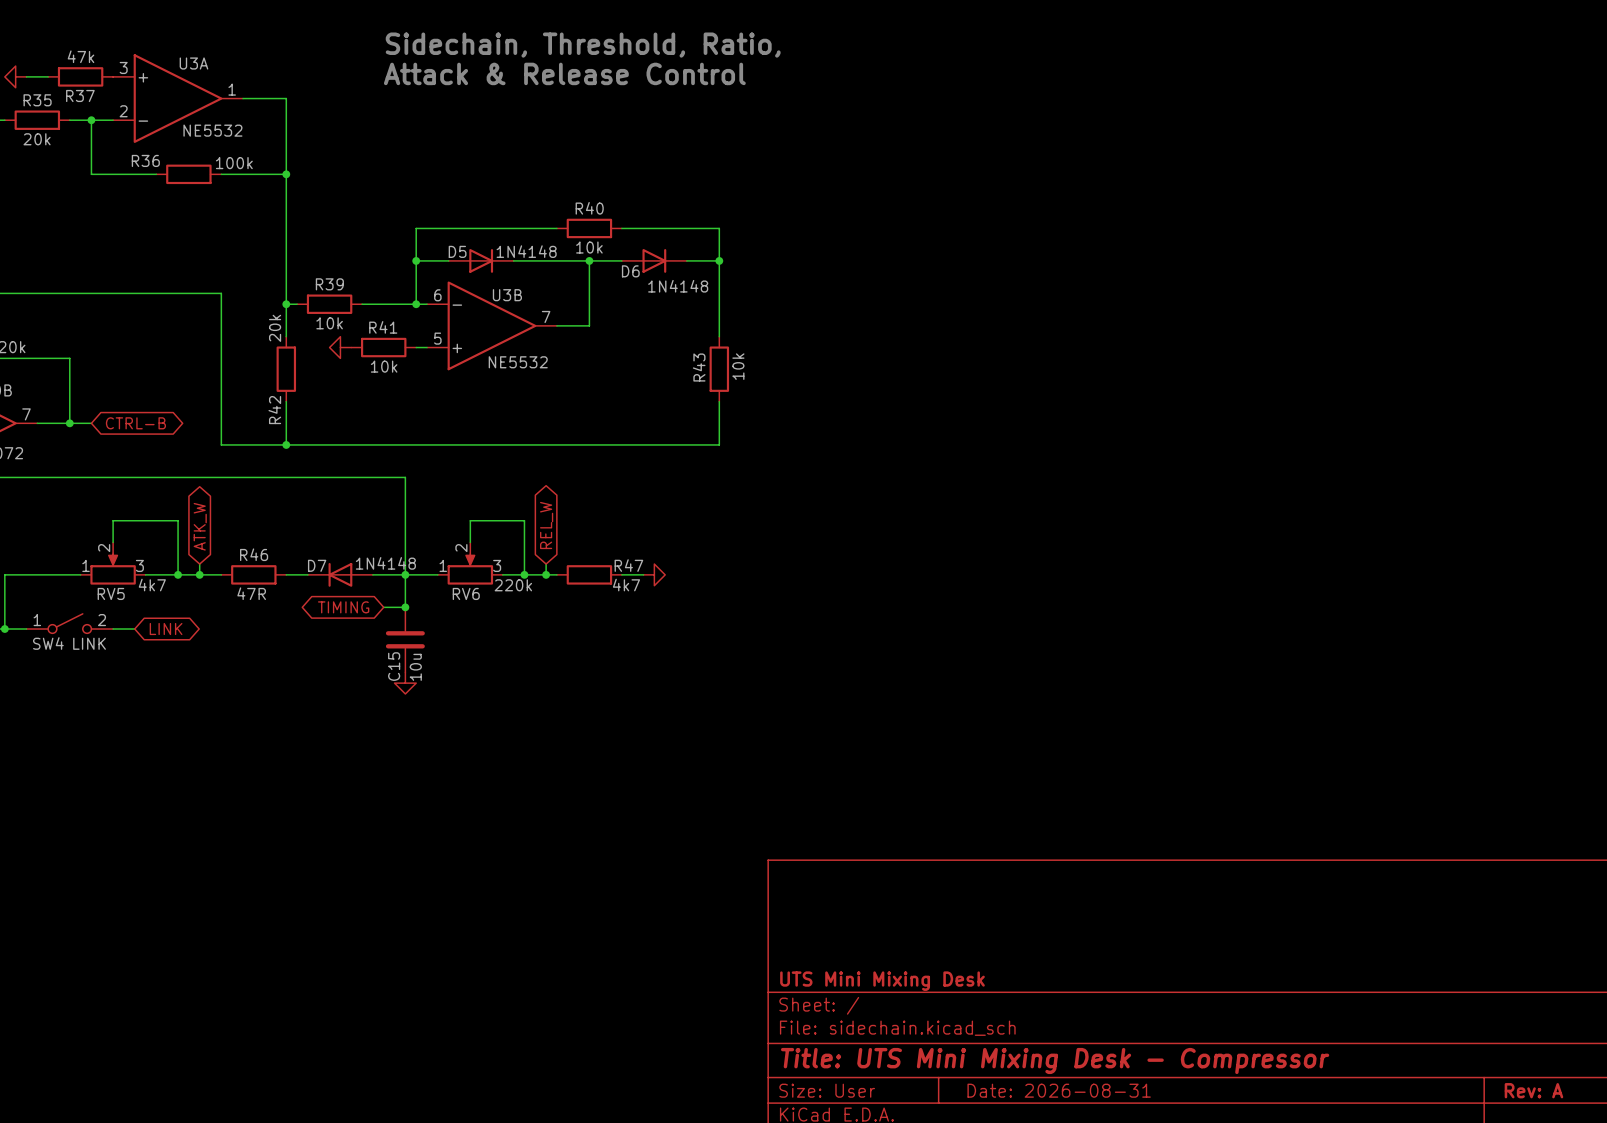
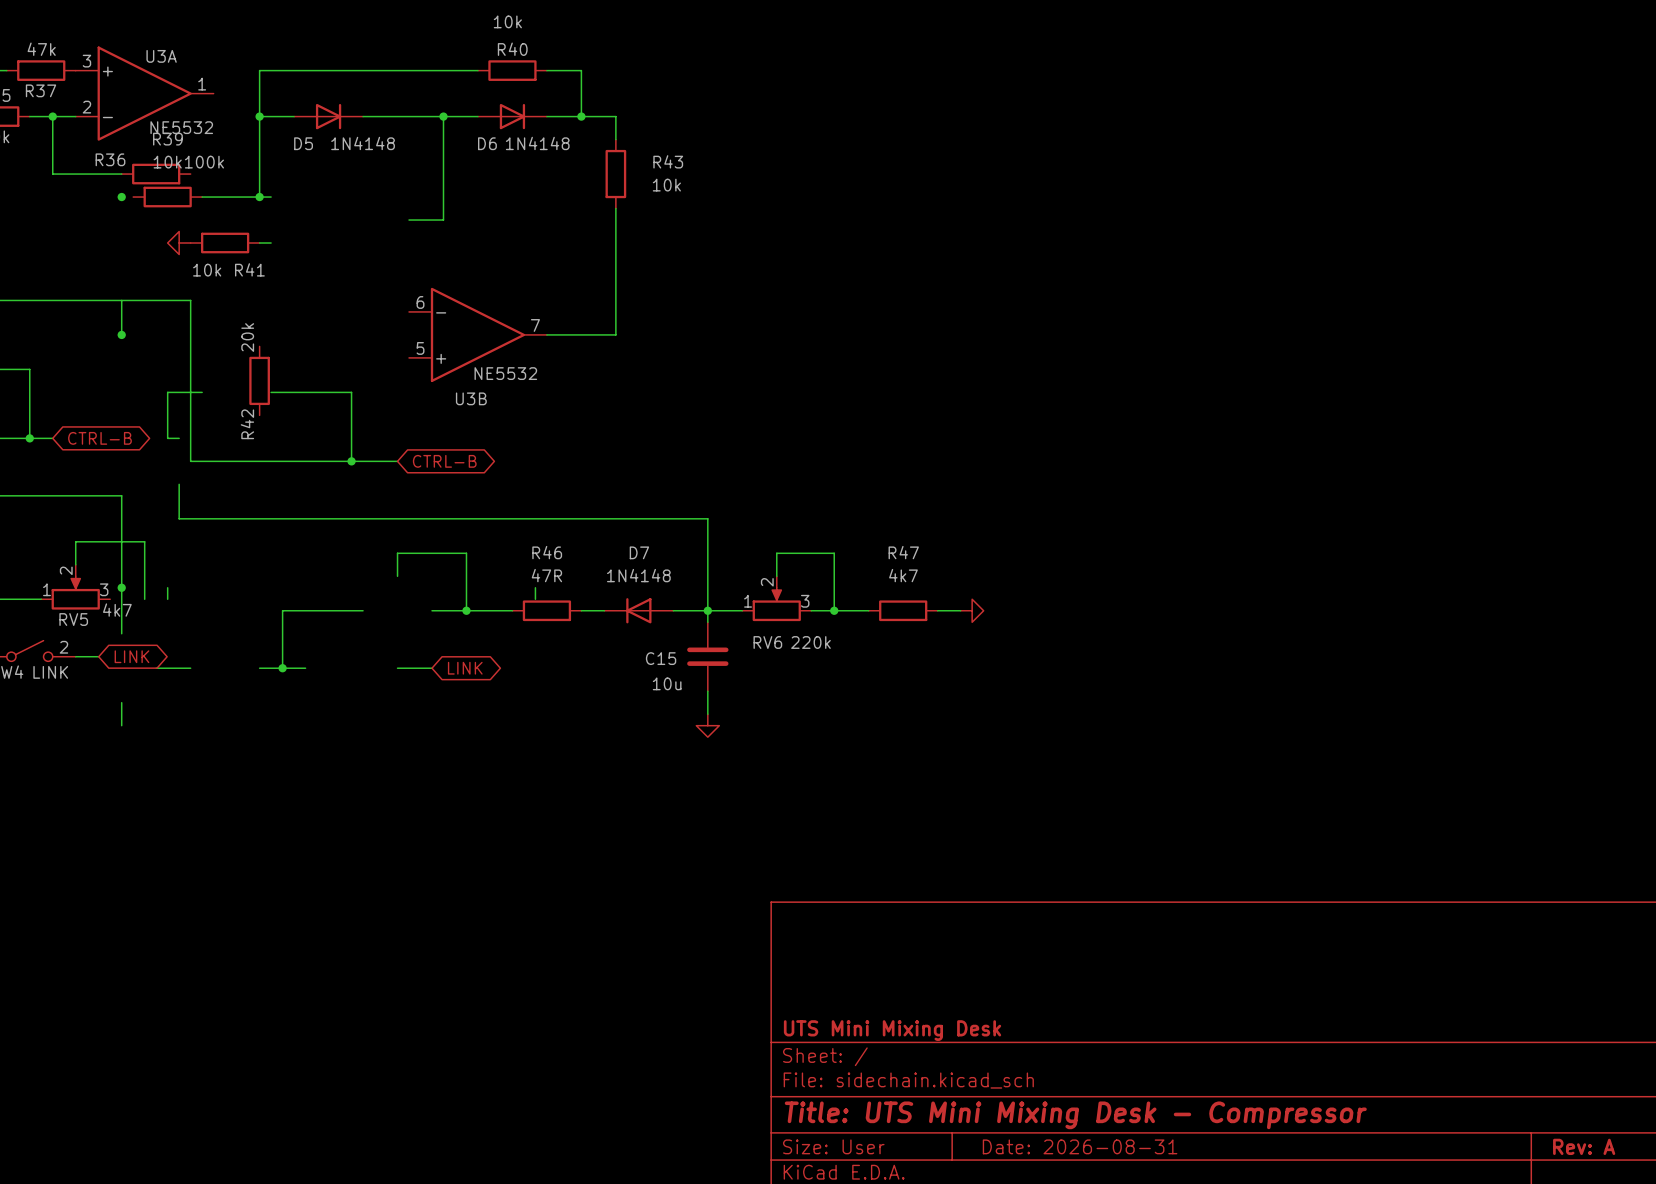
text: Sidechain, Threshold, Ratio, (583, 45) -> none
text: Attack & Release Control (564, 73) -> none
wire: none -> (546, 70) (581, 70) (581, 116)
wire: (243, 98) (286, 98) -> (477, 70) (259, 70) (259, 93)
junction: none -> (259, 116)
wire: none -> (443, 116) (443, 220) (409, 220)
junction: none -> (443, 116)
wire: none -> (546, 116) (615, 116) (615, 139)
junction: none -> (581, 116)
wire: (221, 174) (286, 174) -> none
junction position: (286, 174) -> (259, 197)
junction: none -> (121, 197)
wire: (286, 195) (286, 336) -> none
wire: (556, 228) (416, 228) (416, 304) -> none
R40 position: (589, 228) -> (512, 70)
wire: (621, 228) (719, 228) (719, 336) -> none
R40 value position: 10k (589, 247) -> 10k (507, 21)
D5 name position: D5 (457, 251) -> D5 (303, 143)
D5 value position: 1N4148 (526, 251) -> 1N4148 (363, 143)
wire: (416, 260) (448, 260) -> (259, 116) (294, 116)
junction: (416, 260) -> none
D5 position: (481, 260) -> (328, 116)
wire: (513, 260) (621, 260) -> (363, 116) (477, 116)
wire: (589, 260) (589, 325) -> (615, 208) (615, 334) (581, 334)
junction: (589, 260) -> none
D6 position: (654, 260) -> (512, 116)
wire: (686, 260) (719, 260) -> none
junction: (719, 260) -> none
D6 name position: D6 (630, 271) -> D6 (487, 143)
R39 name position: R39 (329, 284) -> R39 (167, 139)
wire: none -> (121, 300) (121, 334)
U3B name position: U3B (507, 295) -> U3B (471, 398)
wire: (286, 304) (297, 304) -> none
junction: (286, 304) -> none
R39 position: (329, 304) -> (167, 197)
wire: (362, 304) (427, 304) -> (202, 197) (271, 197)
junction: (416, 304) -> none
R39 value position: 10k (329, 323) -> 10k (167, 162)
junction: none -> (121, 334)
R41 name position: R41 (383, 327) -> R41 (249, 269)
power symbol position: (340, 347) -> (179, 243)
R41 position: (383, 347) -> (225, 243)
wire: (416, 347) (427, 347) -> (259, 243) (271, 243)
R41 value position: 10k (384, 366) -> 10k (207, 270)
R43 value rotation: 0° (738, 366) -> 90° clockwise (666, 185)
R43 name rotation: 0° (699, 367) -> 90° clockwise (668, 161)
R43 name position: R43 (699, 367) -> R43 (668, 161)
R43 position: (719, 369) -> (615, 174)
wire: none -> (202, 392) (167, 392) (167, 438) (179, 438)
wire: none -> (271, 392) (351, 392) (351, 461)
wire: (286, 401) (286, 444) -> none
wire: (719, 401) (719, 444) (416, 444) -> none
junction: (286, 444) -> none
junction: none -> (351, 461)
global label: none -> CTRL-B (444, 461)
wire: none -> (179, 484) (179, 518) (707, 518) (707, 622)
wire: (156, 477) (405, 477) (405, 607) (383, 607) -> (121, 495) (121, 633)
global label: REL_W (546, 525) -> none
global label: ATK_W (200, 526) -> none
wire: (470, 542) (470, 520) (524, 520) (524, 574) -> none
wire: none -> (397, 576) (397, 553) (466, 553) (466, 610)
wire: none -> (776, 576) (776, 553) (834, 553) (834, 610)
R46 name position: R46 (254, 554) -> R46 (547, 552)
D7 value position: 1N4148 (385, 563) -> 1N4148 (638, 575)
RV6 position: (470, 563) -> (776, 598)
junction: none -> (121, 587)
D7 name position: D7 (317, 565) -> D7 (639, 552)
R47 name position: R47 (628, 565) -> R47 (903, 552)
wire: (145, 574) (221, 574) -> none
junction: (178, 574) -> none
junction: (199, 574) -> none
R46 position: (253, 574) -> (546, 610)
wire: (286, 574) (307, 574) -> none
D7 position: (340, 574) -> (638, 610)
wire: (372, 574) (437, 574) -> none
junction: (405, 574) -> none
wire: (502, 574) (556, 574) -> none
junction: (524, 574) -> none
junction: (546, 574) -> none
R47 position: (589, 574) -> (903, 610)
wire: (621, 574) (643, 574) -> (581, 610) (604, 610)
power symbol rotation: 0° (654, 574) -> 90° clockwise (707, 725)
power symbol position: (654, 574) -> (707, 725)
wire: none -> (363, 610) (282, 610) (282, 668)
wire: none -> (432, 610) (512, 610)
junction: none -> (466, 610)
RV6 value position: 220k (513, 585) -> 220k (810, 642)
R47 value position: 4k7 (626, 585) -> 4k7 (903, 575)
wire: none -> (673, 610) (742, 610)
junction: none -> (707, 610)
wire: none -> (811, 610) (868, 610)
junction: none -> (834, 610)
wire: none -> (937, 610) (960, 610)
power symbol: none -> (972, 610)
R46 value position: 47R (251, 593) -> 47R (546, 575)
RV6 name position: RV6 (466, 593) -> RV6 (767, 642)
global label: TIMING (343, 607) -> none
junction: (405, 607) -> none
wire: none -> (156, 668) (190, 668)
wire: none -> (259, 668) (305, 668)
junction: none -> (282, 668)
C15 position: (405, 639) -> (707, 656)
wire: none -> (397, 668) (432, 668)
global label: none -> LINK (465, 668)
wire: none -> (707, 691) (707, 714)
C15 name rotation: 0° (394, 666) -> 90° clockwise (661, 658)
C15 name position: C15 (394, 666) -> C15 (661, 658)
C15 value rotation: 0° (415, 667) -> 90° clockwise (667, 683)
C15 value position: 10u (415, 667) -> 10u (667, 683)
wire: none -> (121, 702) (121, 725)
power symbol: (405, 683) -> none

